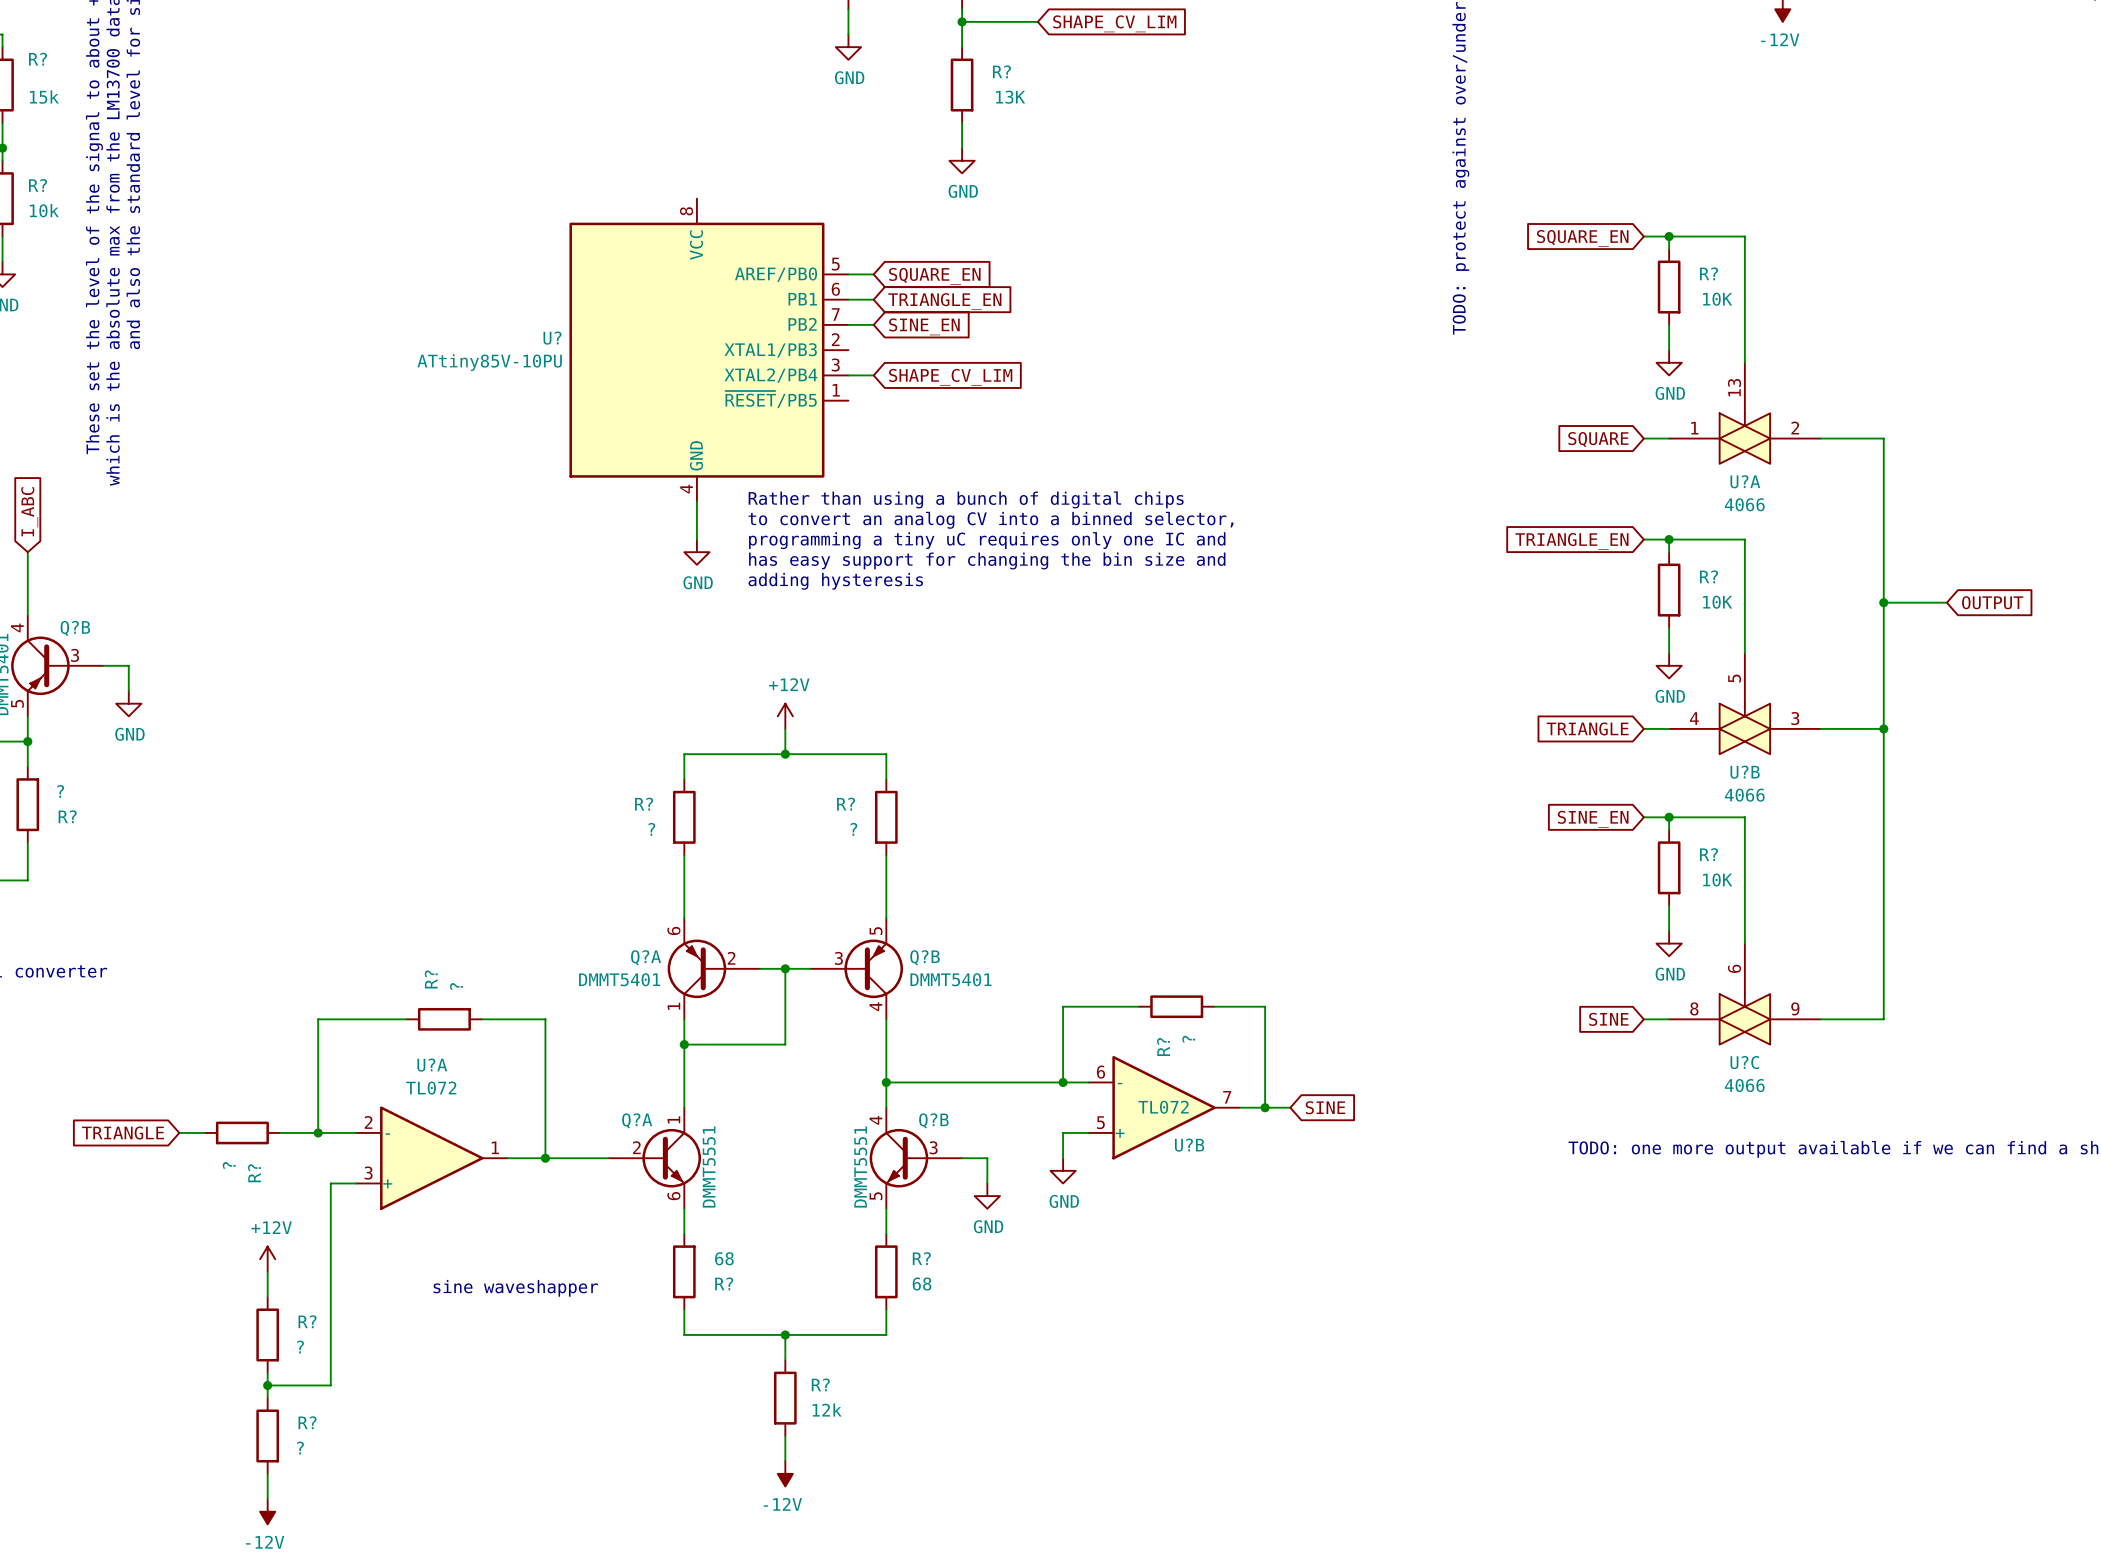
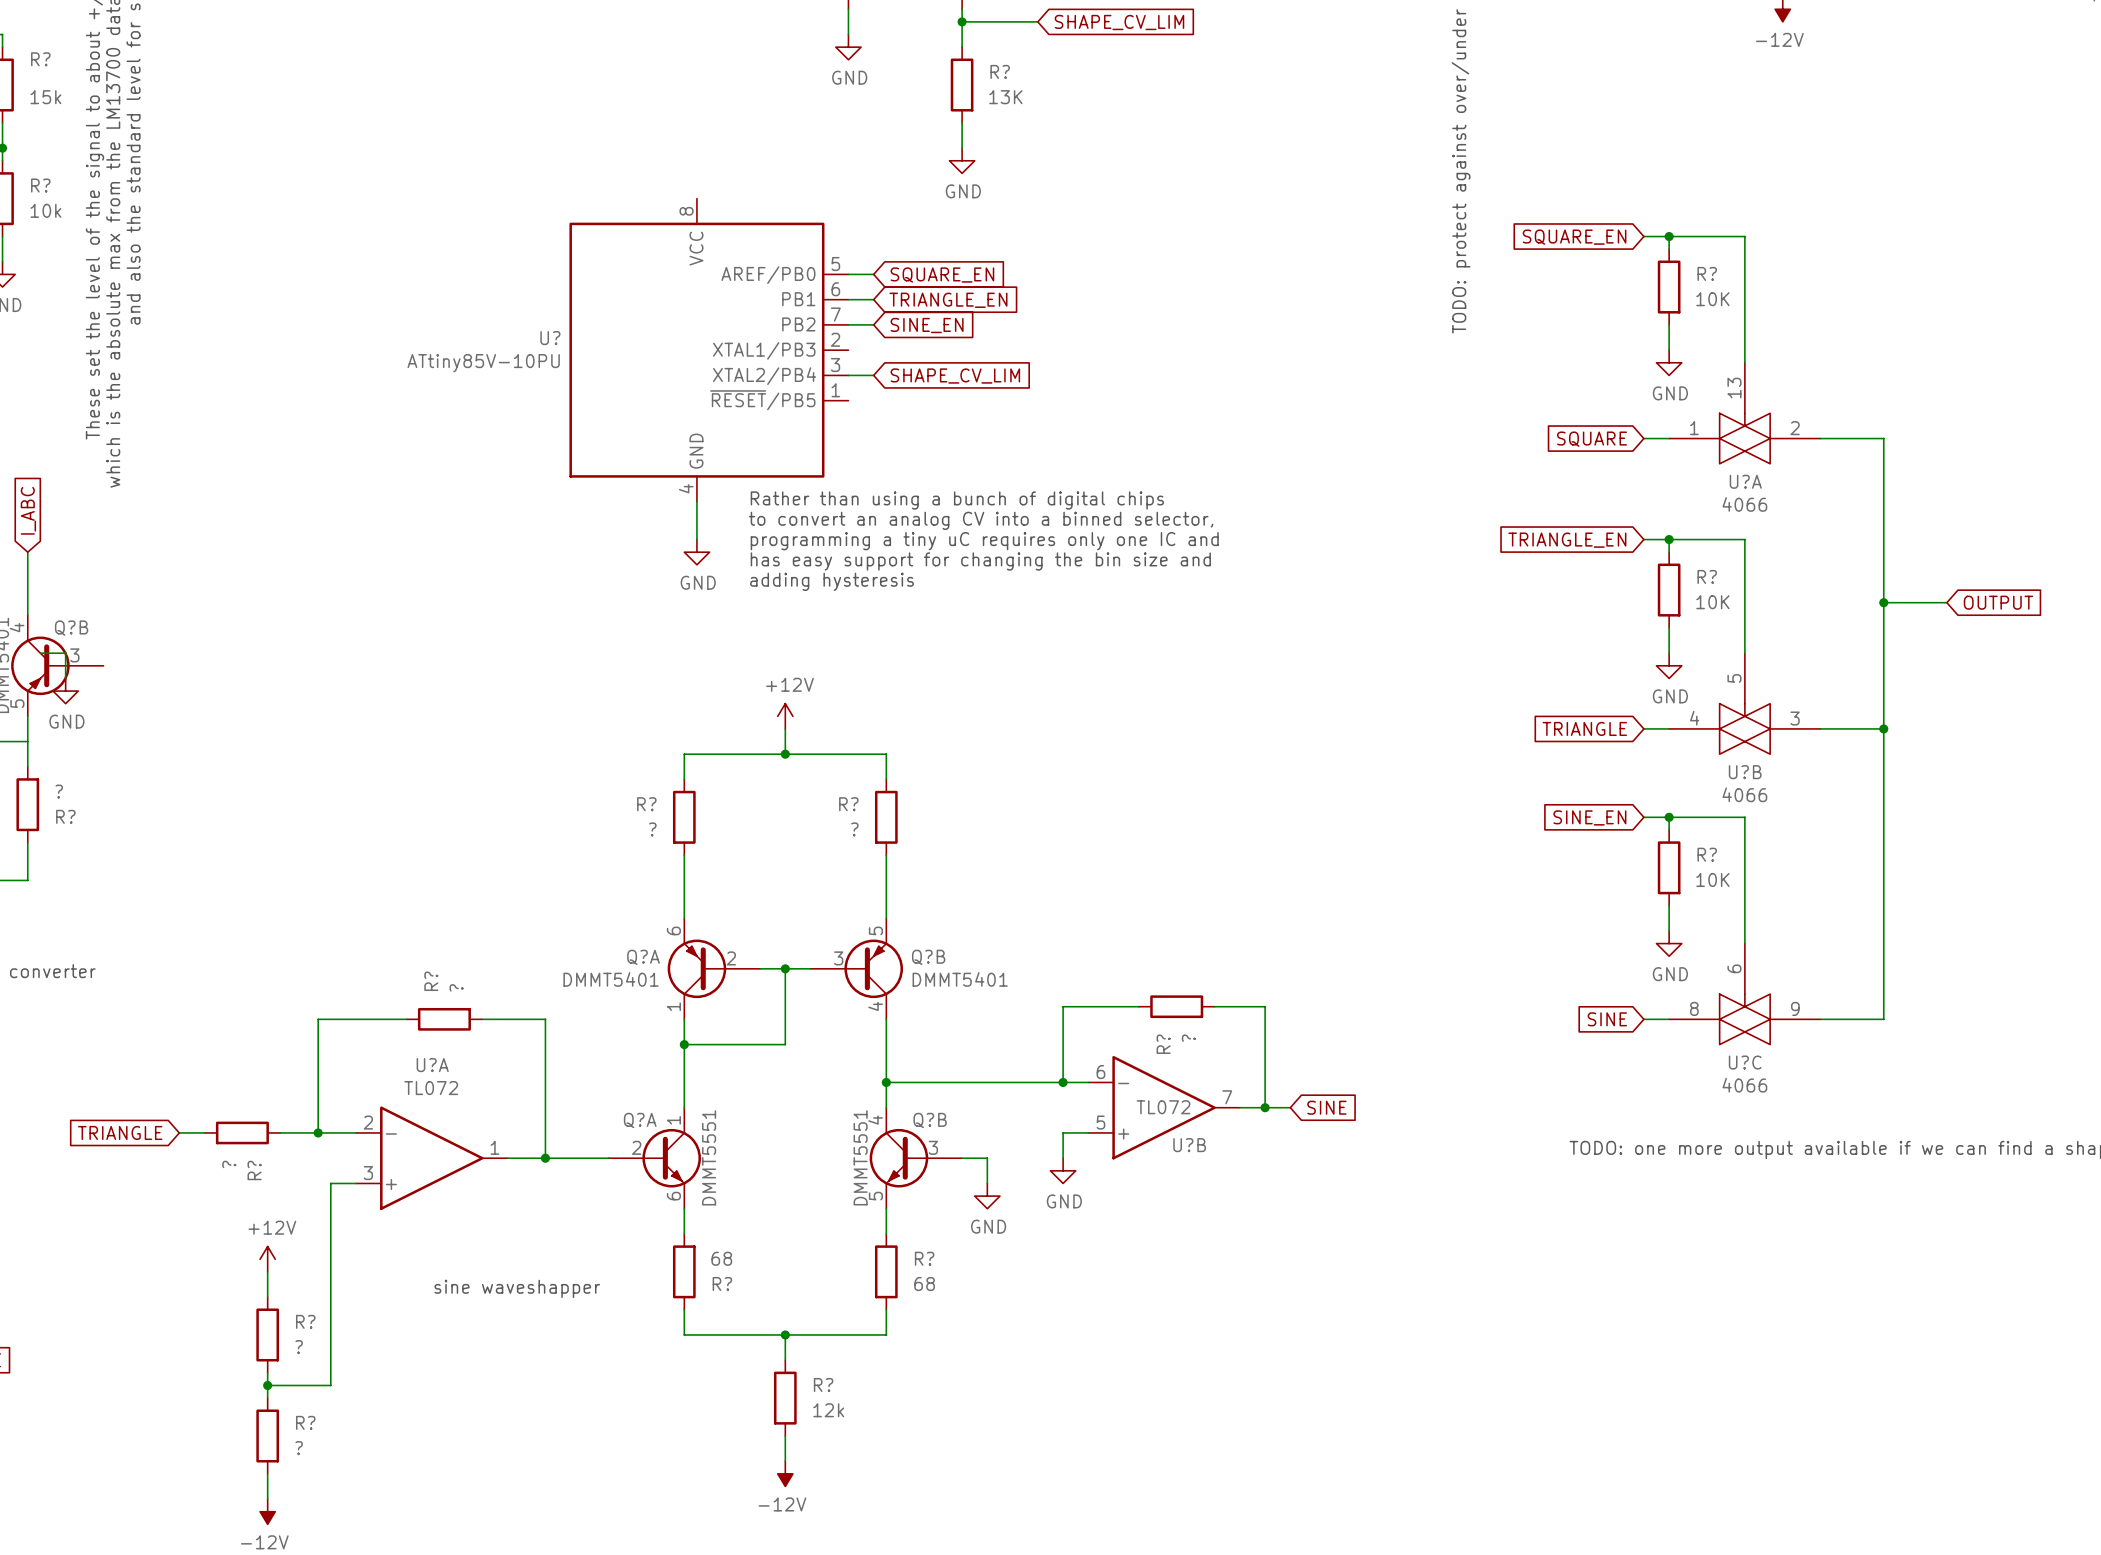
wire: (103, 665) (128, 665) (128, 691) -> (40, 653) (65, 653) (65, 678)
power symbol position: GND (128, 703) -> GND (65, 691)
junction: (27, 741) -> none

